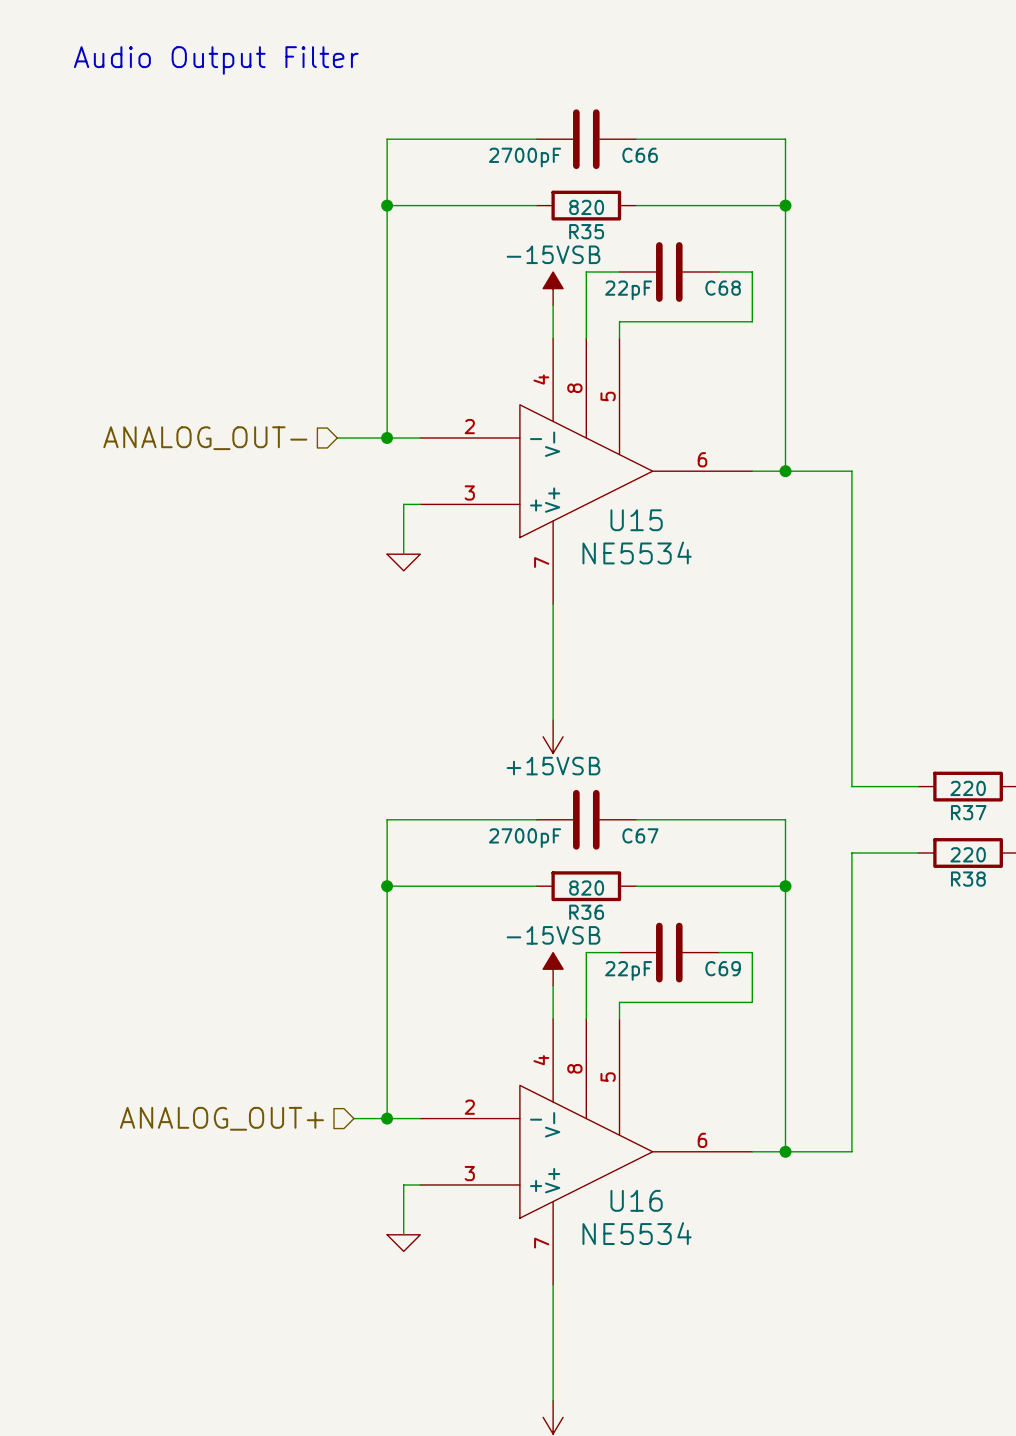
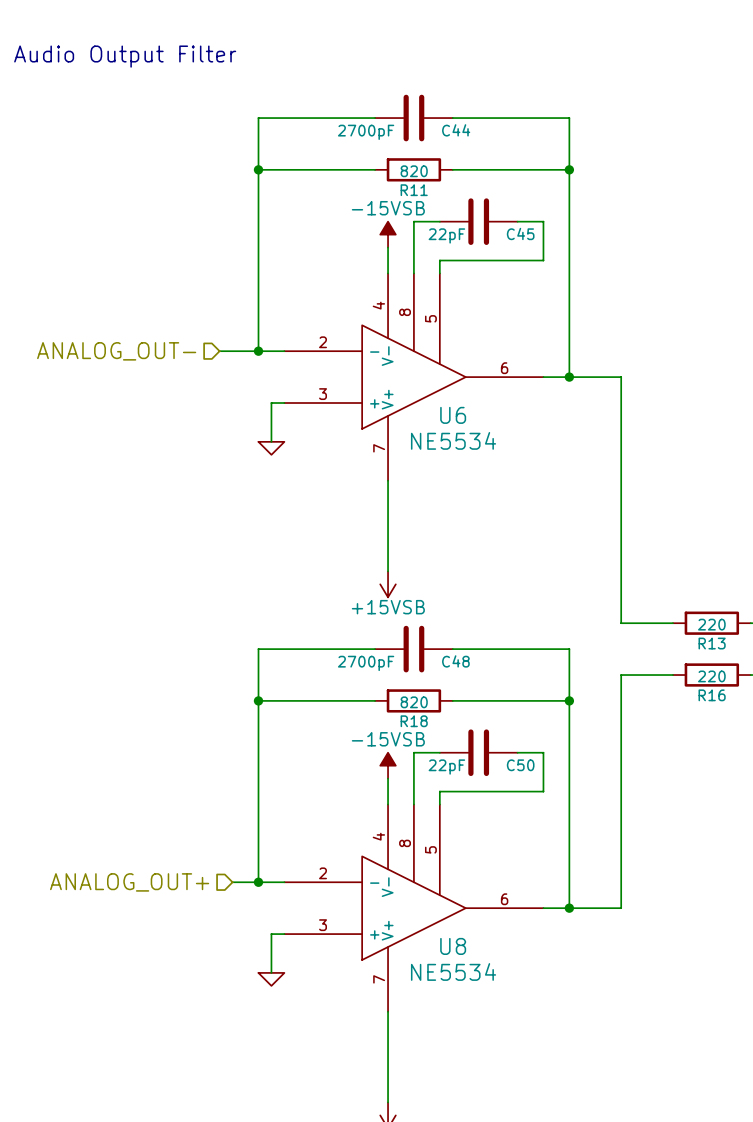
C66 name: C66 (640, 155) -> C44 (456, 130)
R35 name: R35 (586, 231) -> R11 (414, 190)
C68 name: C68 (723, 288) -> C45 (520, 233)
U15 name: U15 (636, 520) -> U6 (453, 415)
R37 name: R37 (968, 812) -> R13 (712, 643)
C67 name: C67 (640, 835) -> C48 (455, 661)
R38 name: R38 (968, 879) -> R16 (712, 695)
R36 name: R36 (586, 912) -> R18 (414, 721)
C69 name: C69 (723, 968) -> C50 (520, 765)
U16 name: U16 (636, 1200) -> U8 (453, 946)

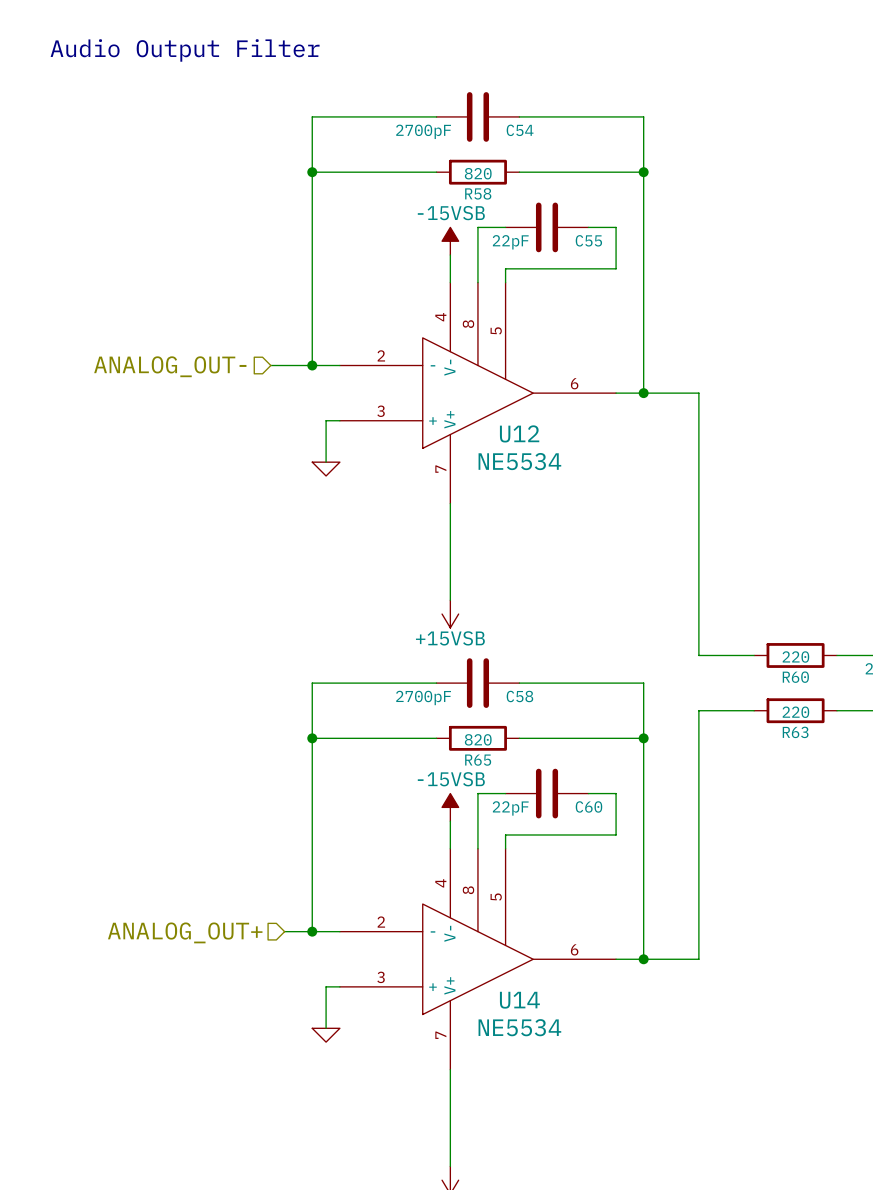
C44 name: C44 (456, 130) -> C54 (520, 130)
R11 name: R11 (414, 190) -> R58 (478, 193)
C45 name: C45 (520, 233) -> C55 (588, 240)
U6 name: U6 (453, 415) -> U12 (519, 433)
R13 name: R13 (712, 643) -> R60 (795, 677)
C48 name: C48 (455, 661) -> C58 (519, 696)
R16 name: R16 (712, 695) -> R63 (795, 732)
R18 name: R18 (414, 721) -> R65 (478, 760)
C50 name: C50 (520, 765) -> C60 (588, 806)
U8 name: U8 (453, 946) -> U14 (519, 1000)

